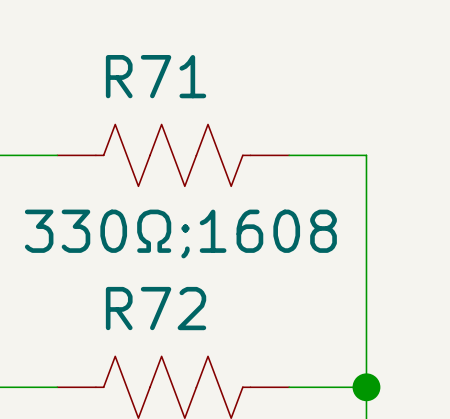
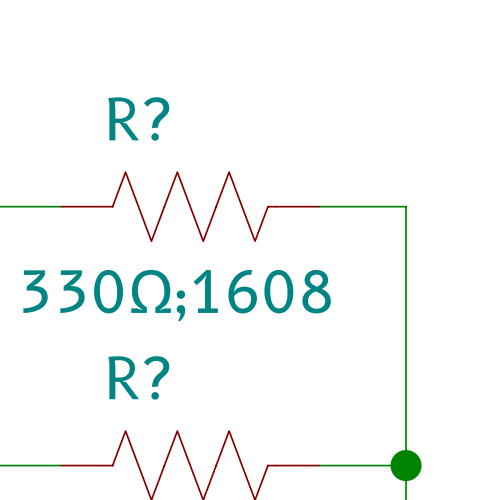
R71 name: R71 (156, 76) -> R? (138, 119)
R72 name: R72 (156, 308) -> R? (138, 377)

